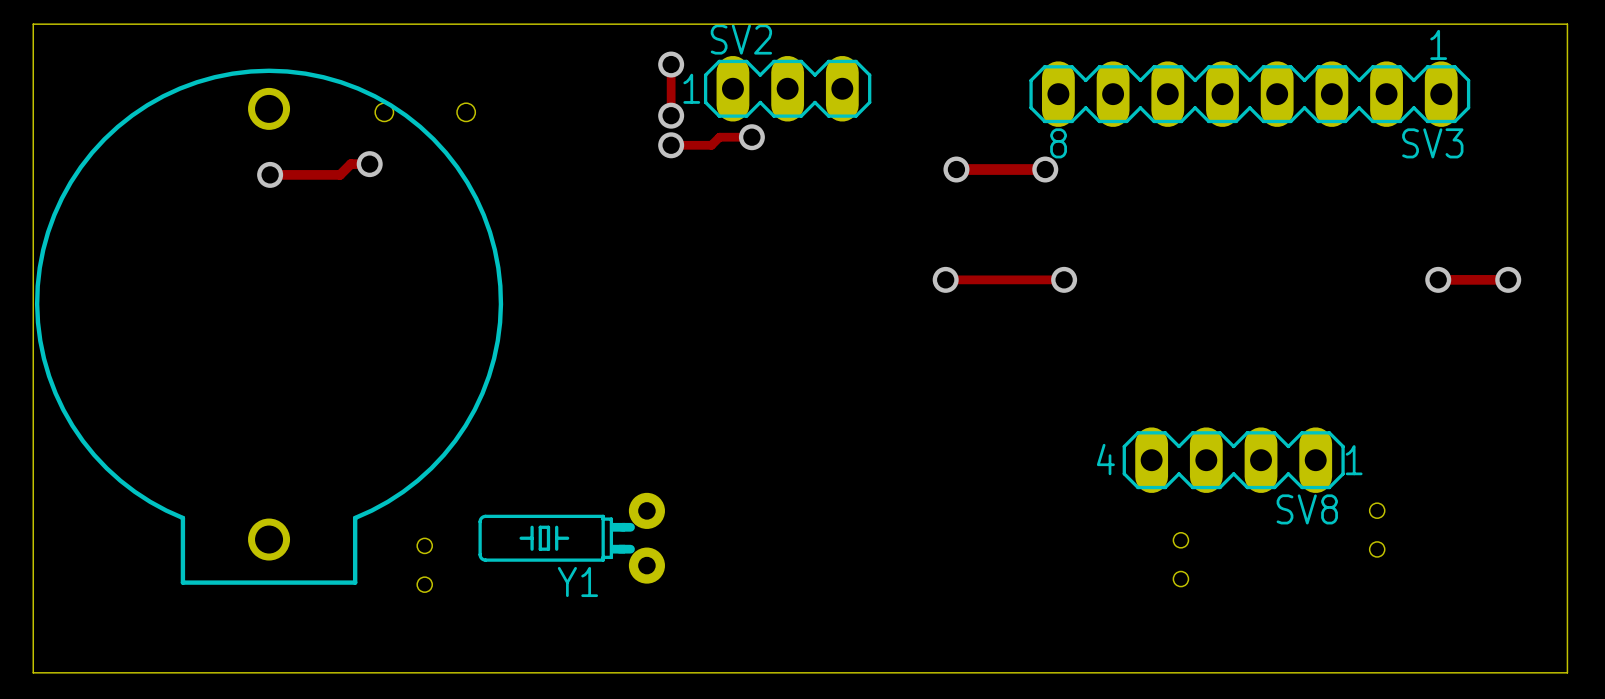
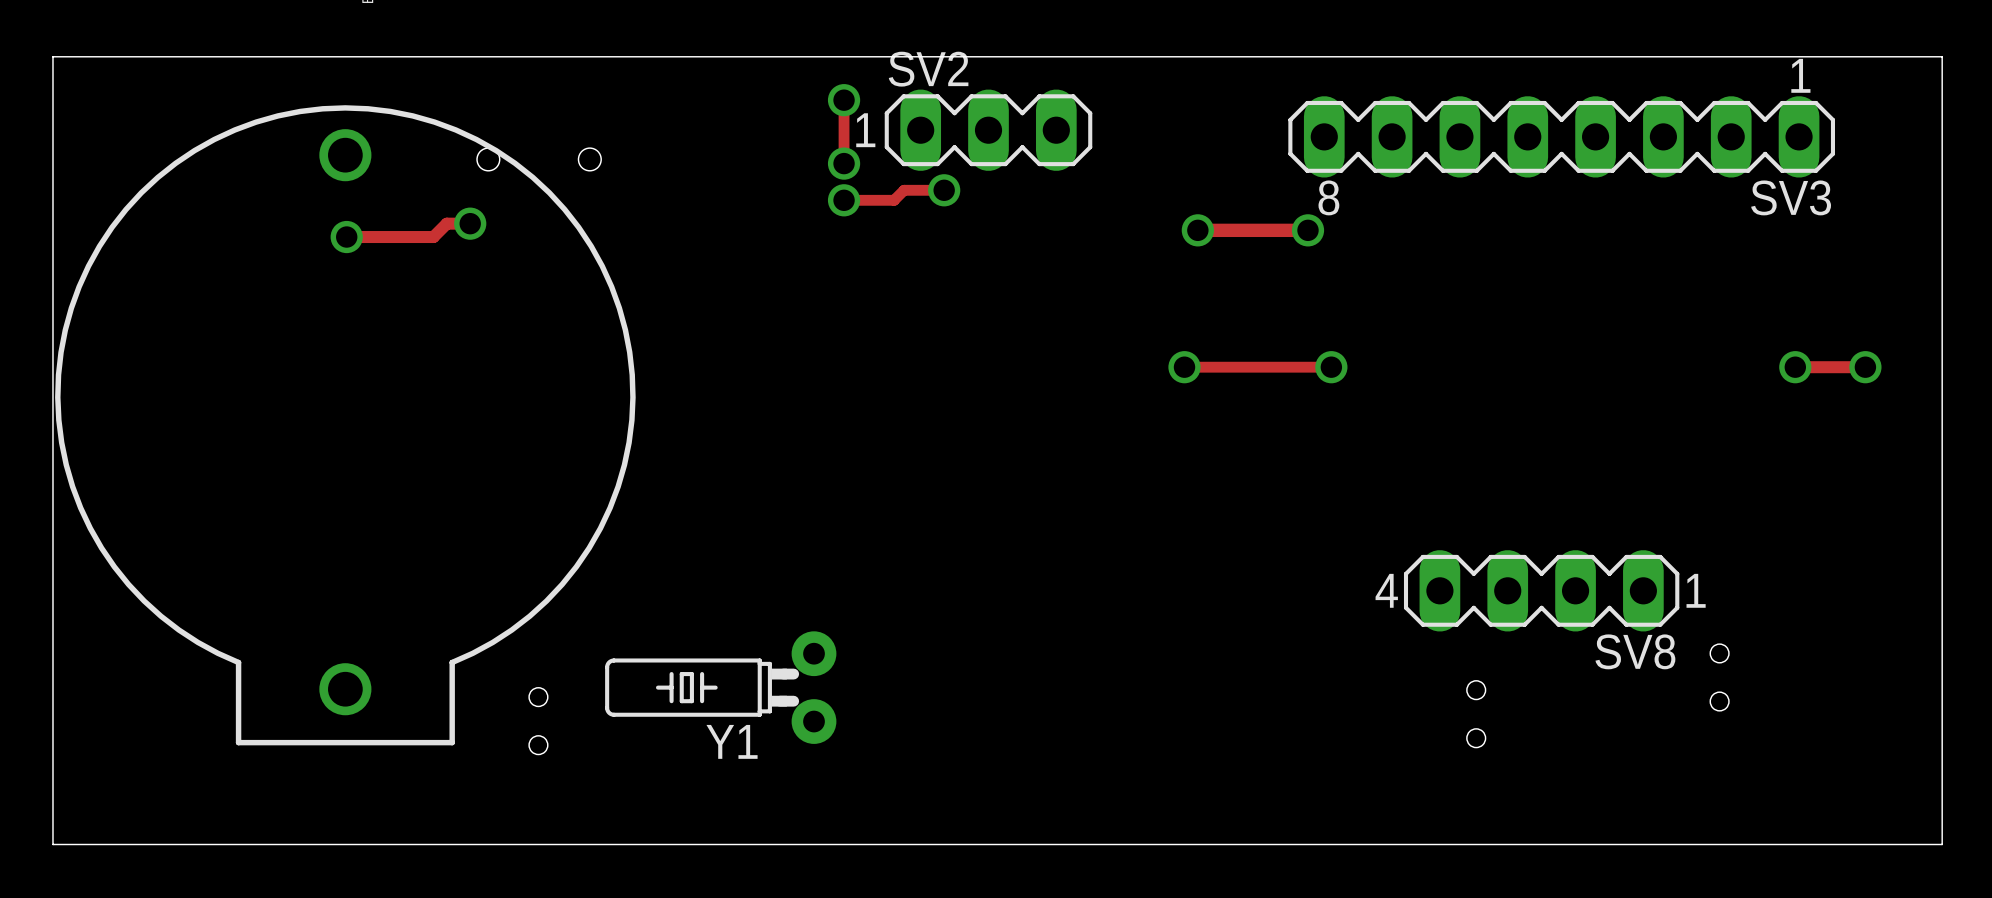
board edge: (33, 29) (33, 24) (1567, 24) (1567, 672) (33, 672) (33, 664) -> (52, 56) (1942, 56) (1942, 844) (52, 844)
via position: (1508, 279) -> (1865, 367)

